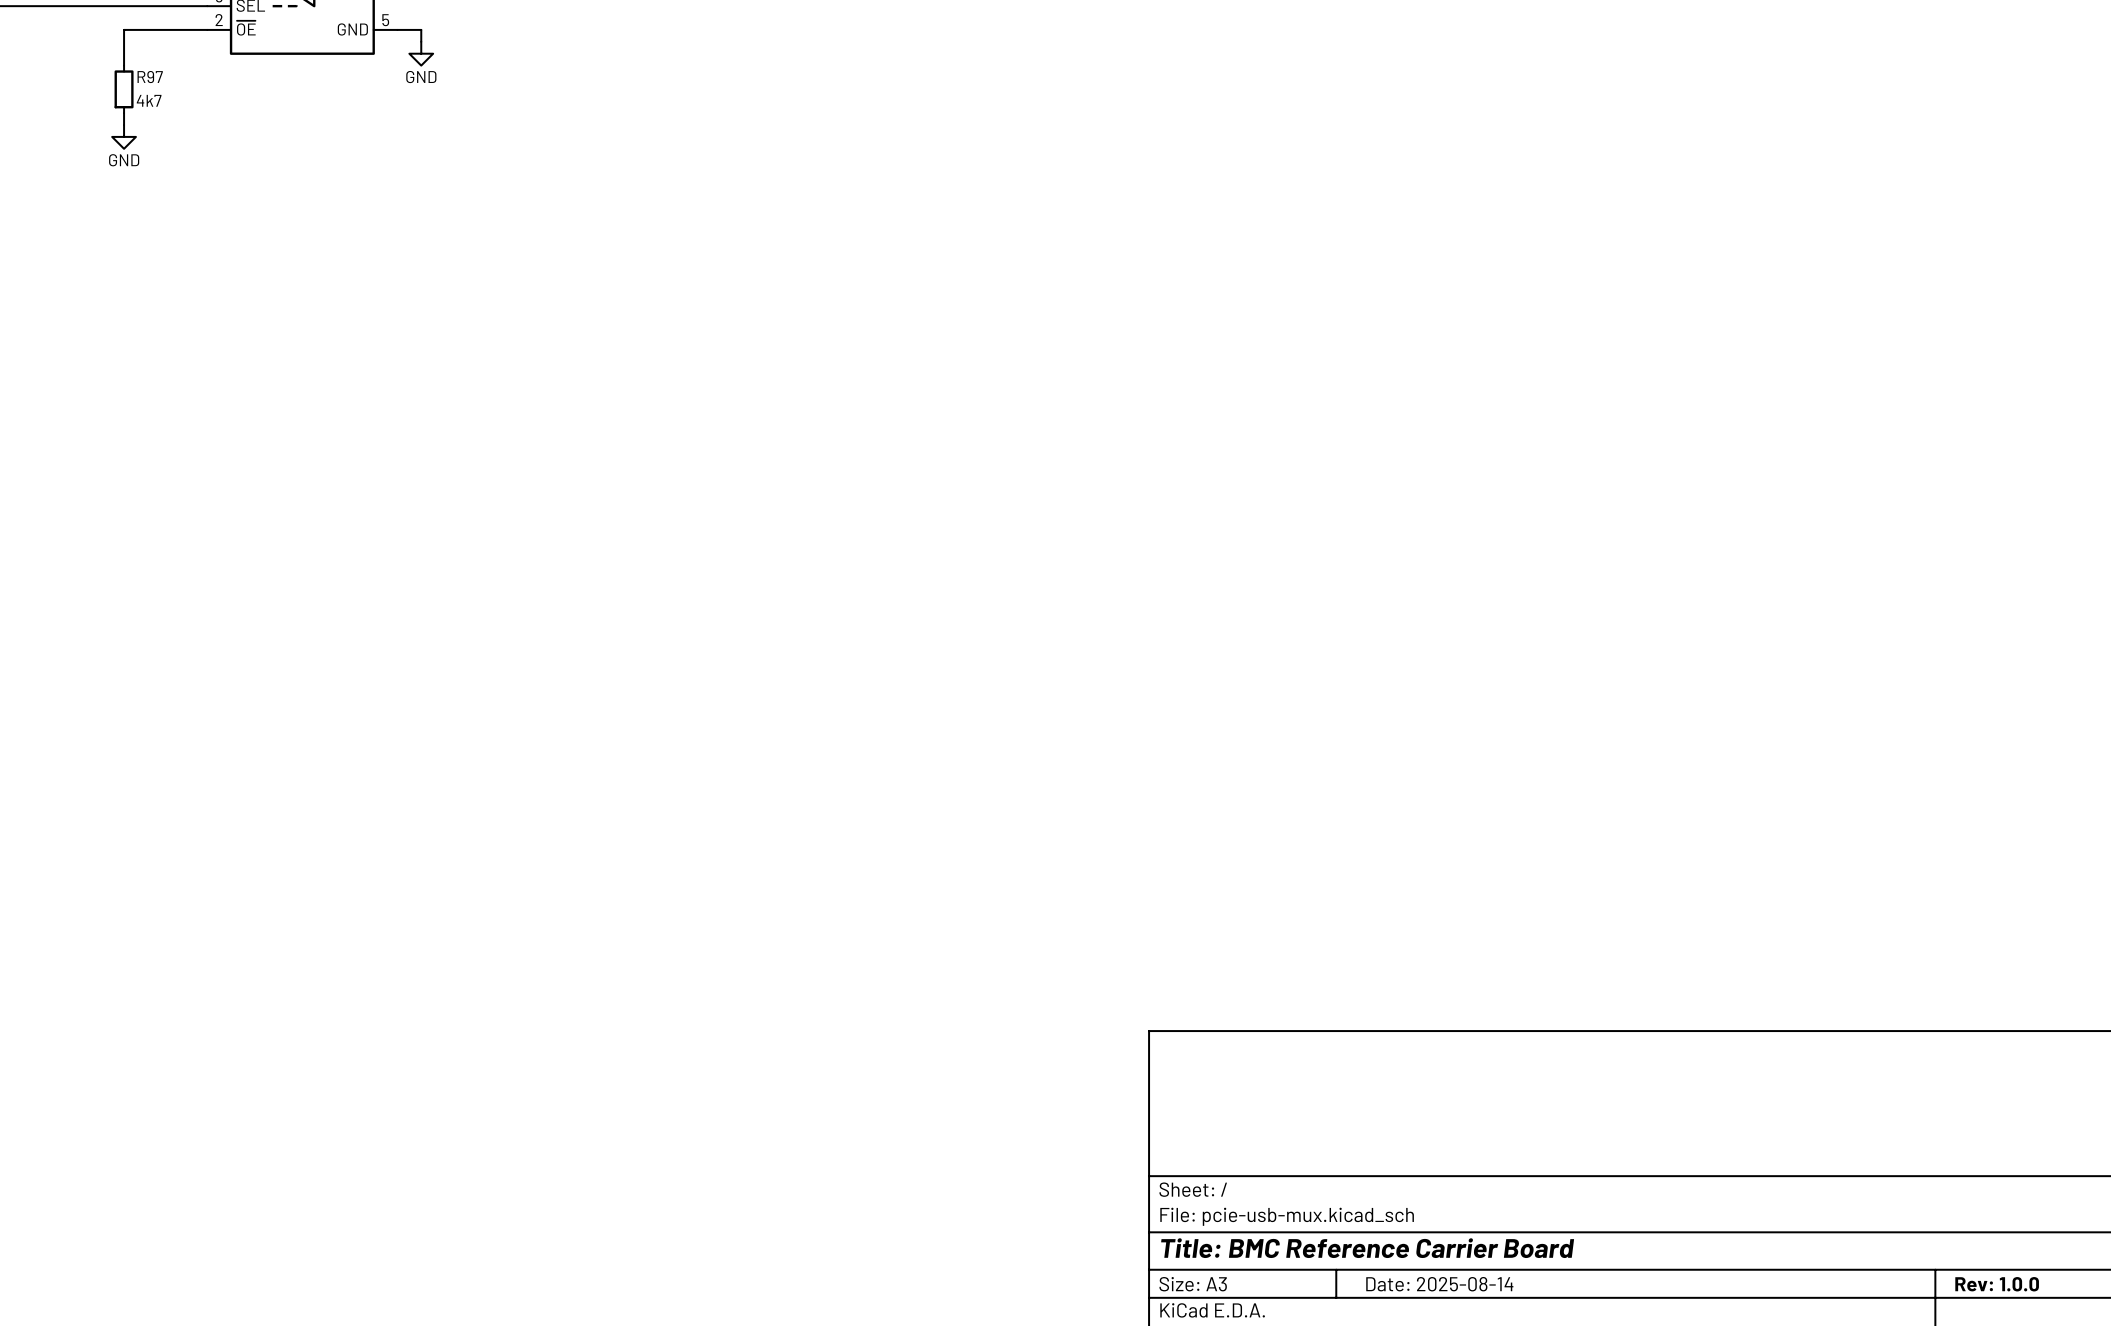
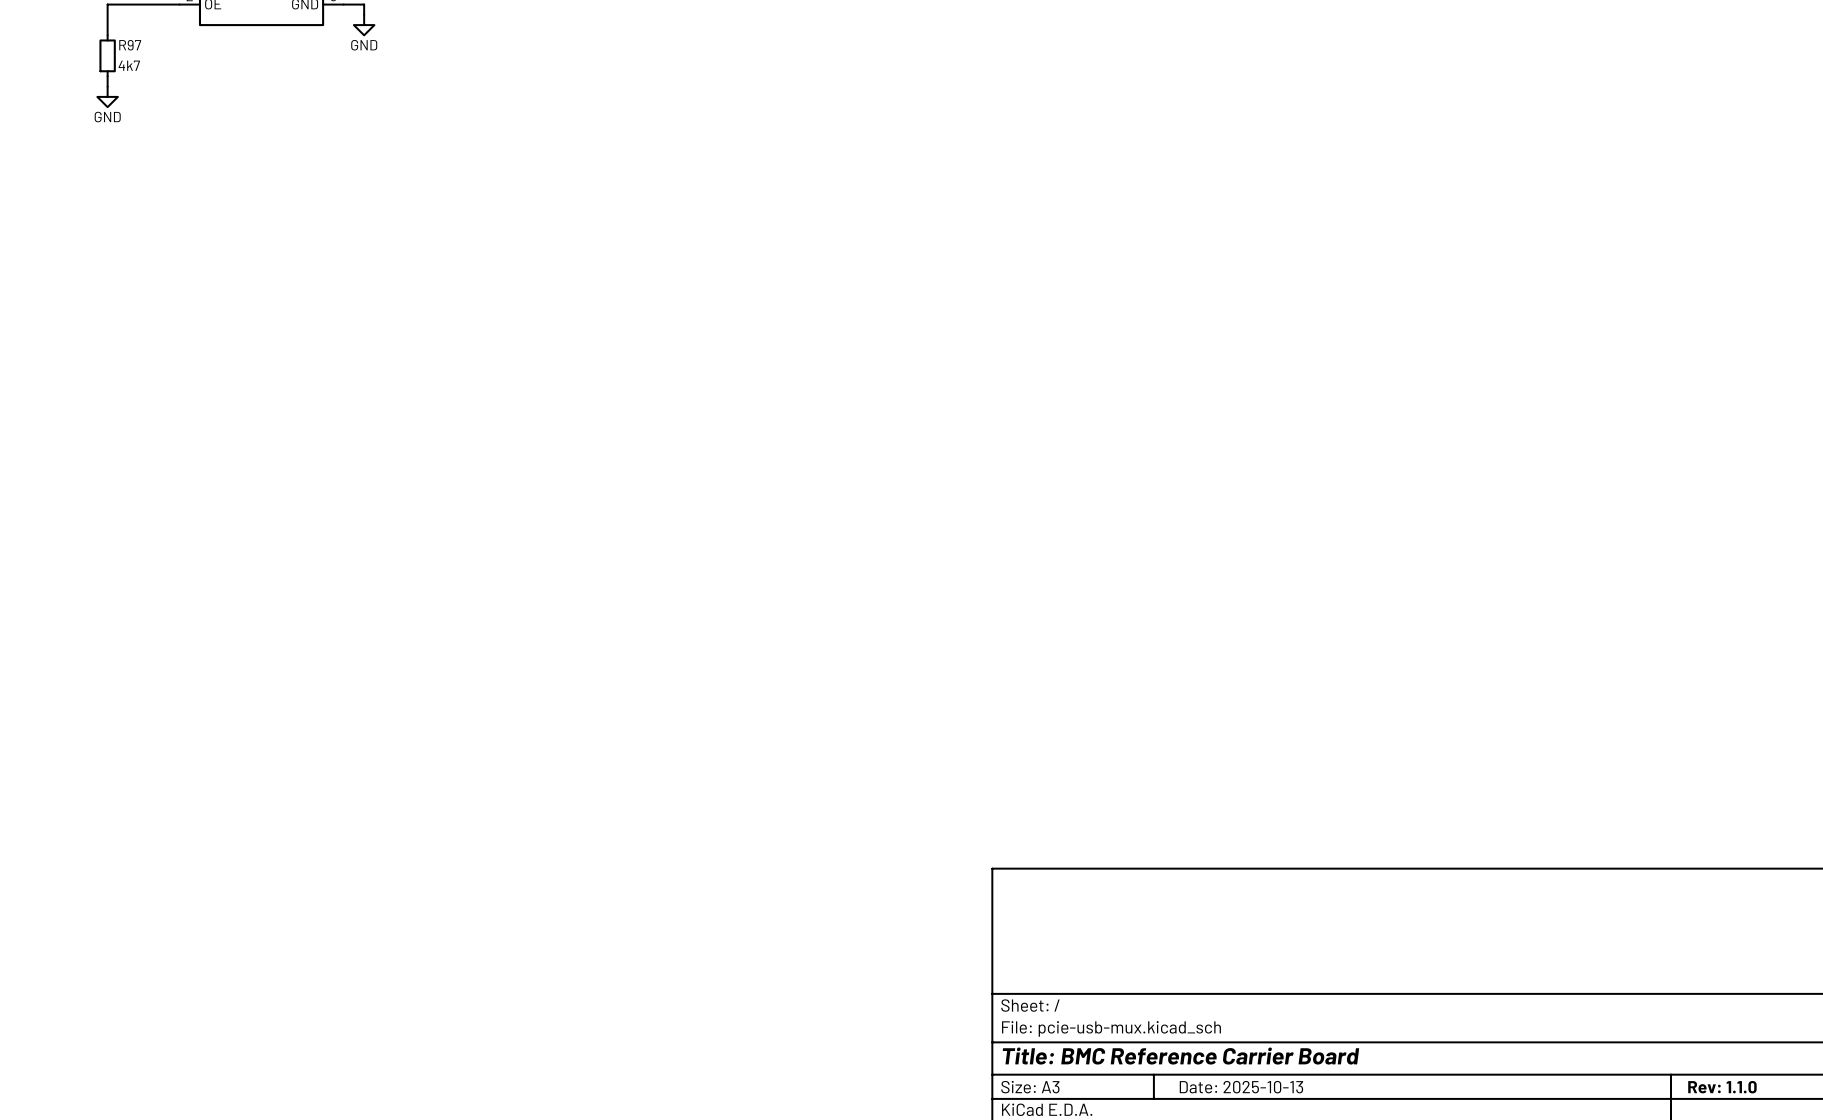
title block: Date: 2025-08-14 (1439, 1284) -> Date: 2025-10-13 (1241, 1087)
title block: Rev: 1.0.0 (1997, 1284) -> Rev: 1.1.0 (1722, 1087)

